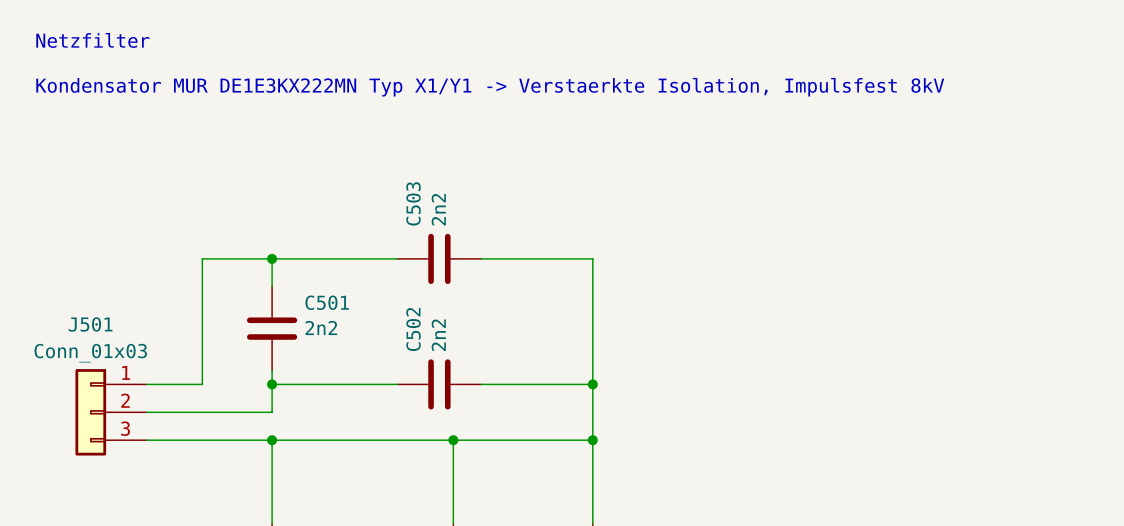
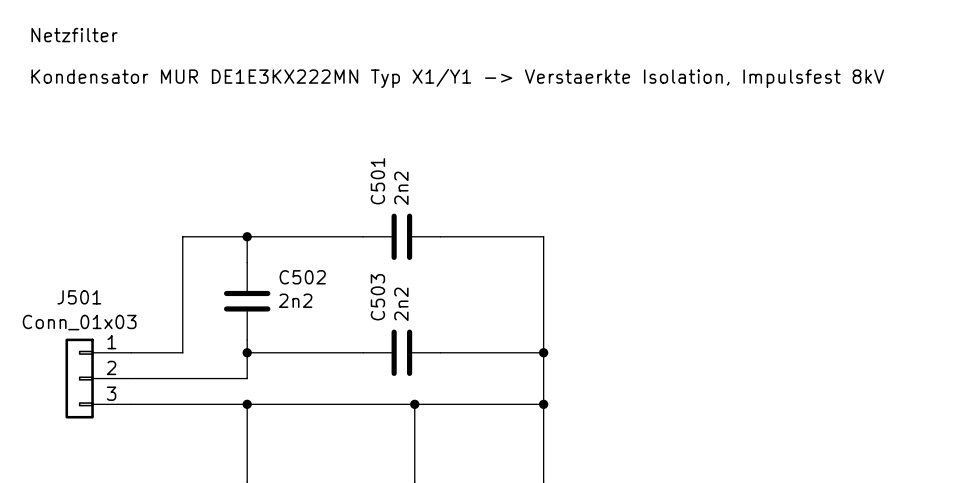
C503 name: C503 (413, 203) -> C501 (377, 181)
C501 name: C501 (327, 302) -> C502 (302, 277)
C502 name: C502 (413, 329) -> C503 (377, 297)

